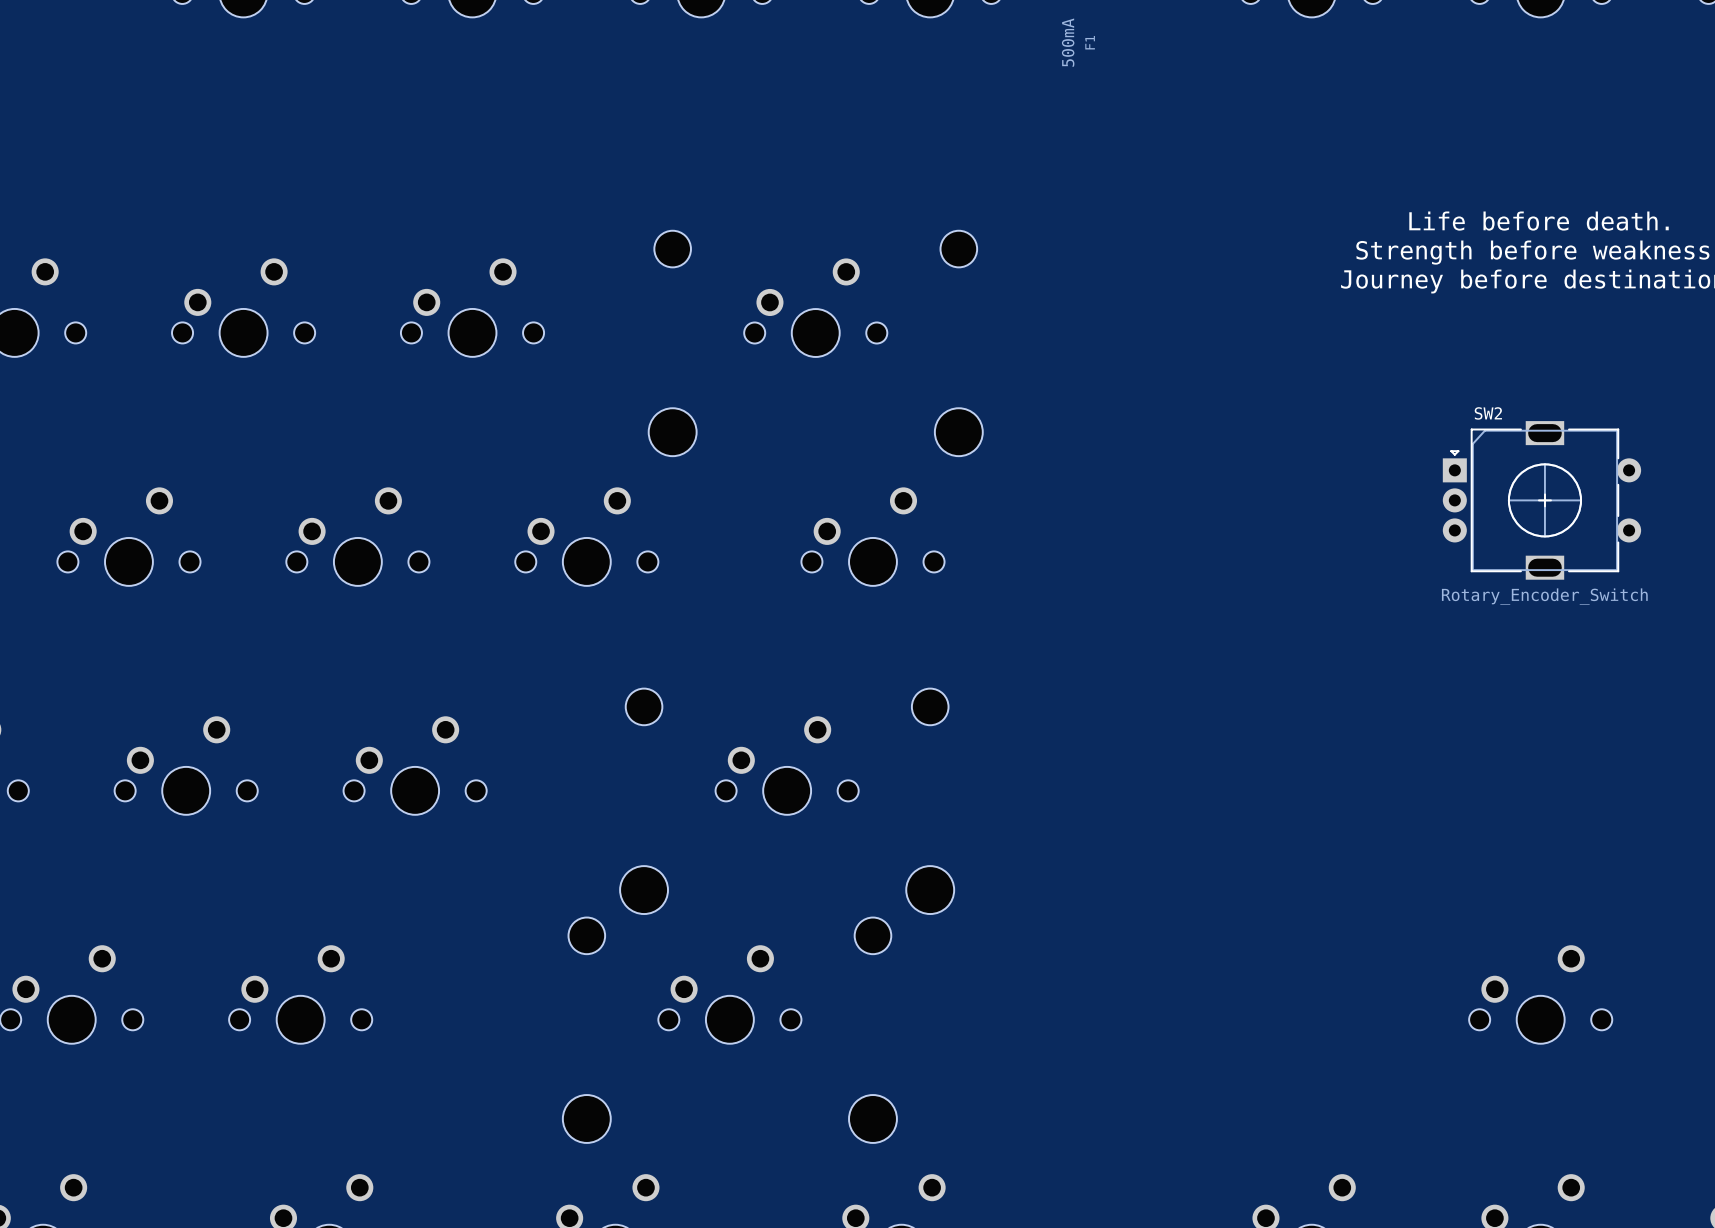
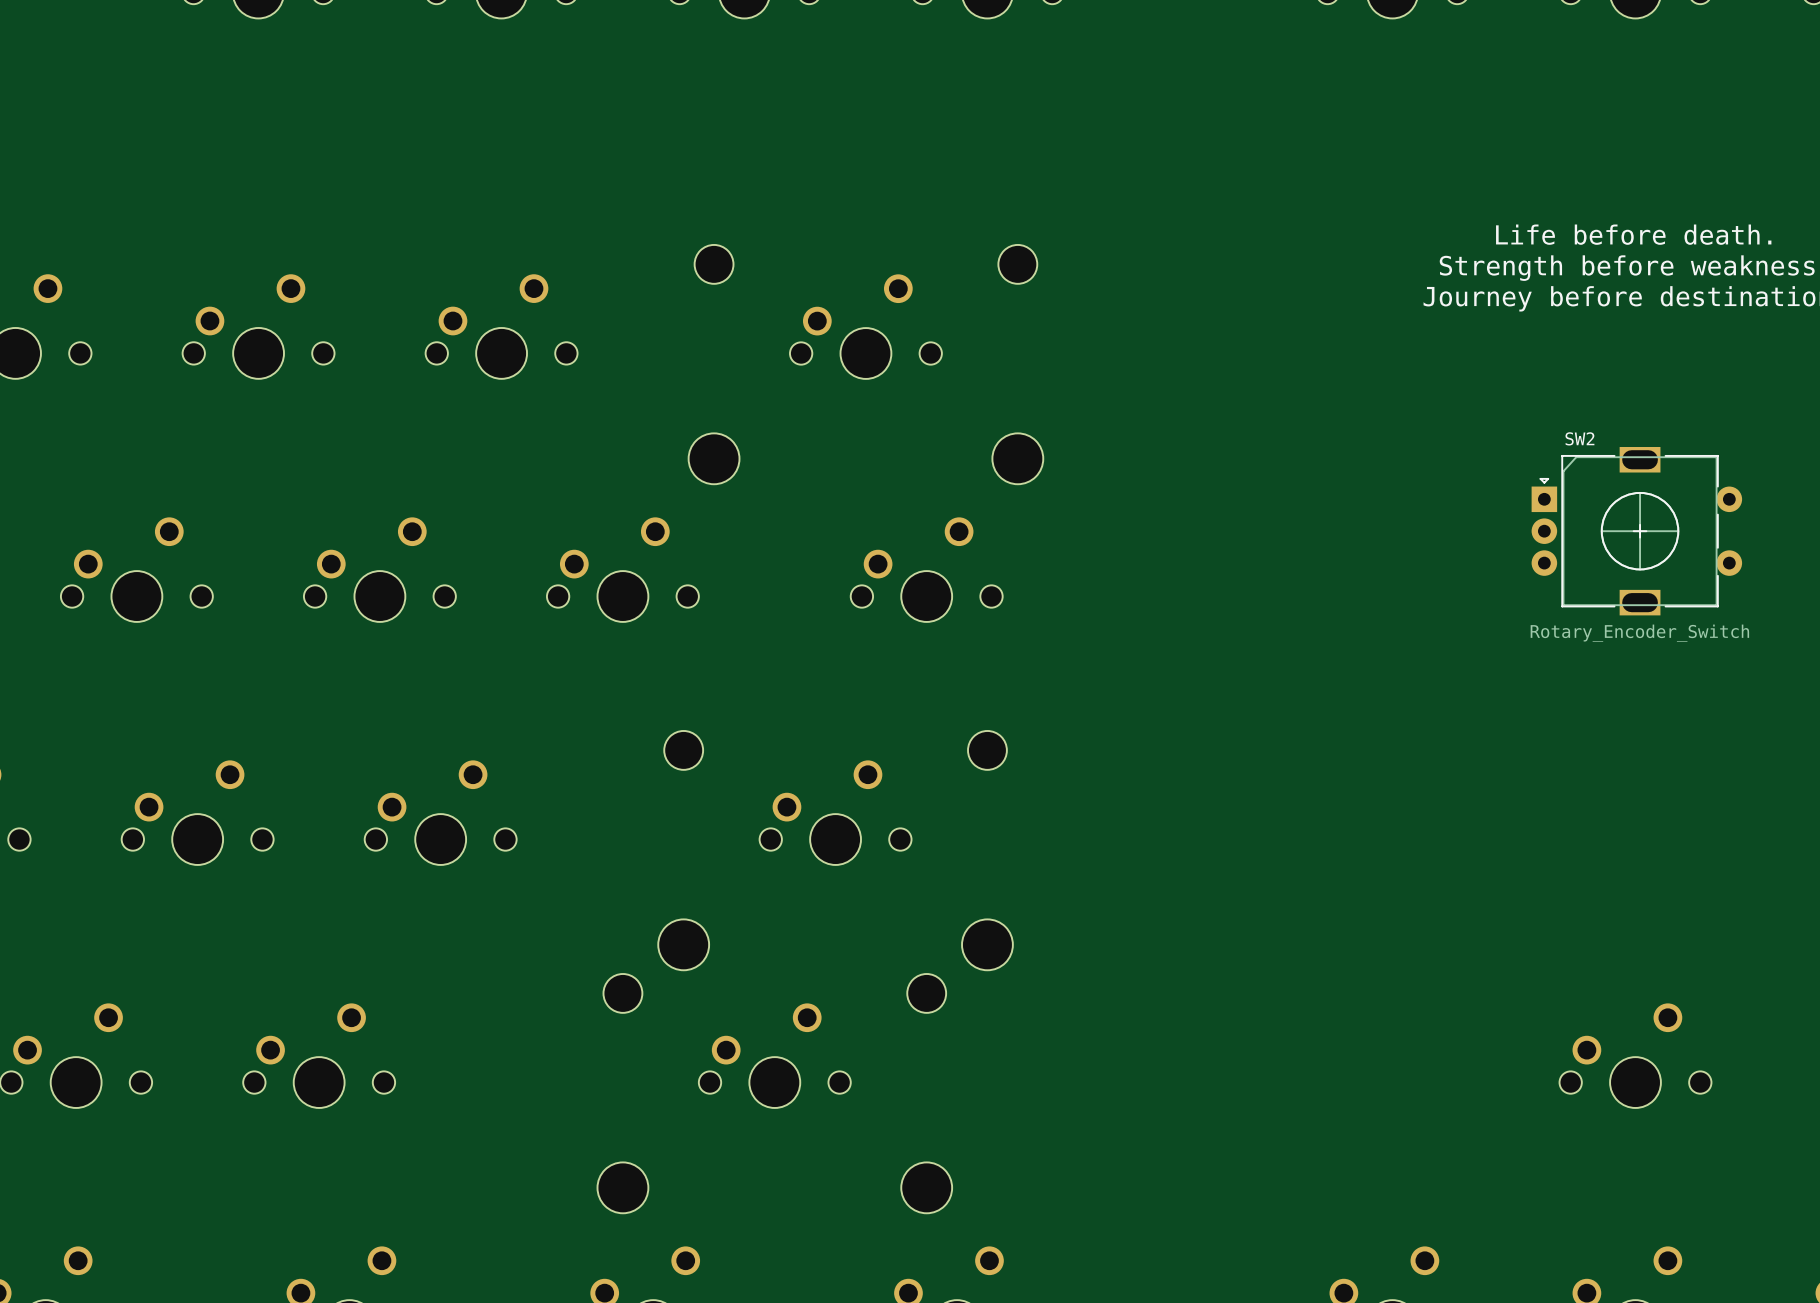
F1: 500mA (1078, 42) -> none

